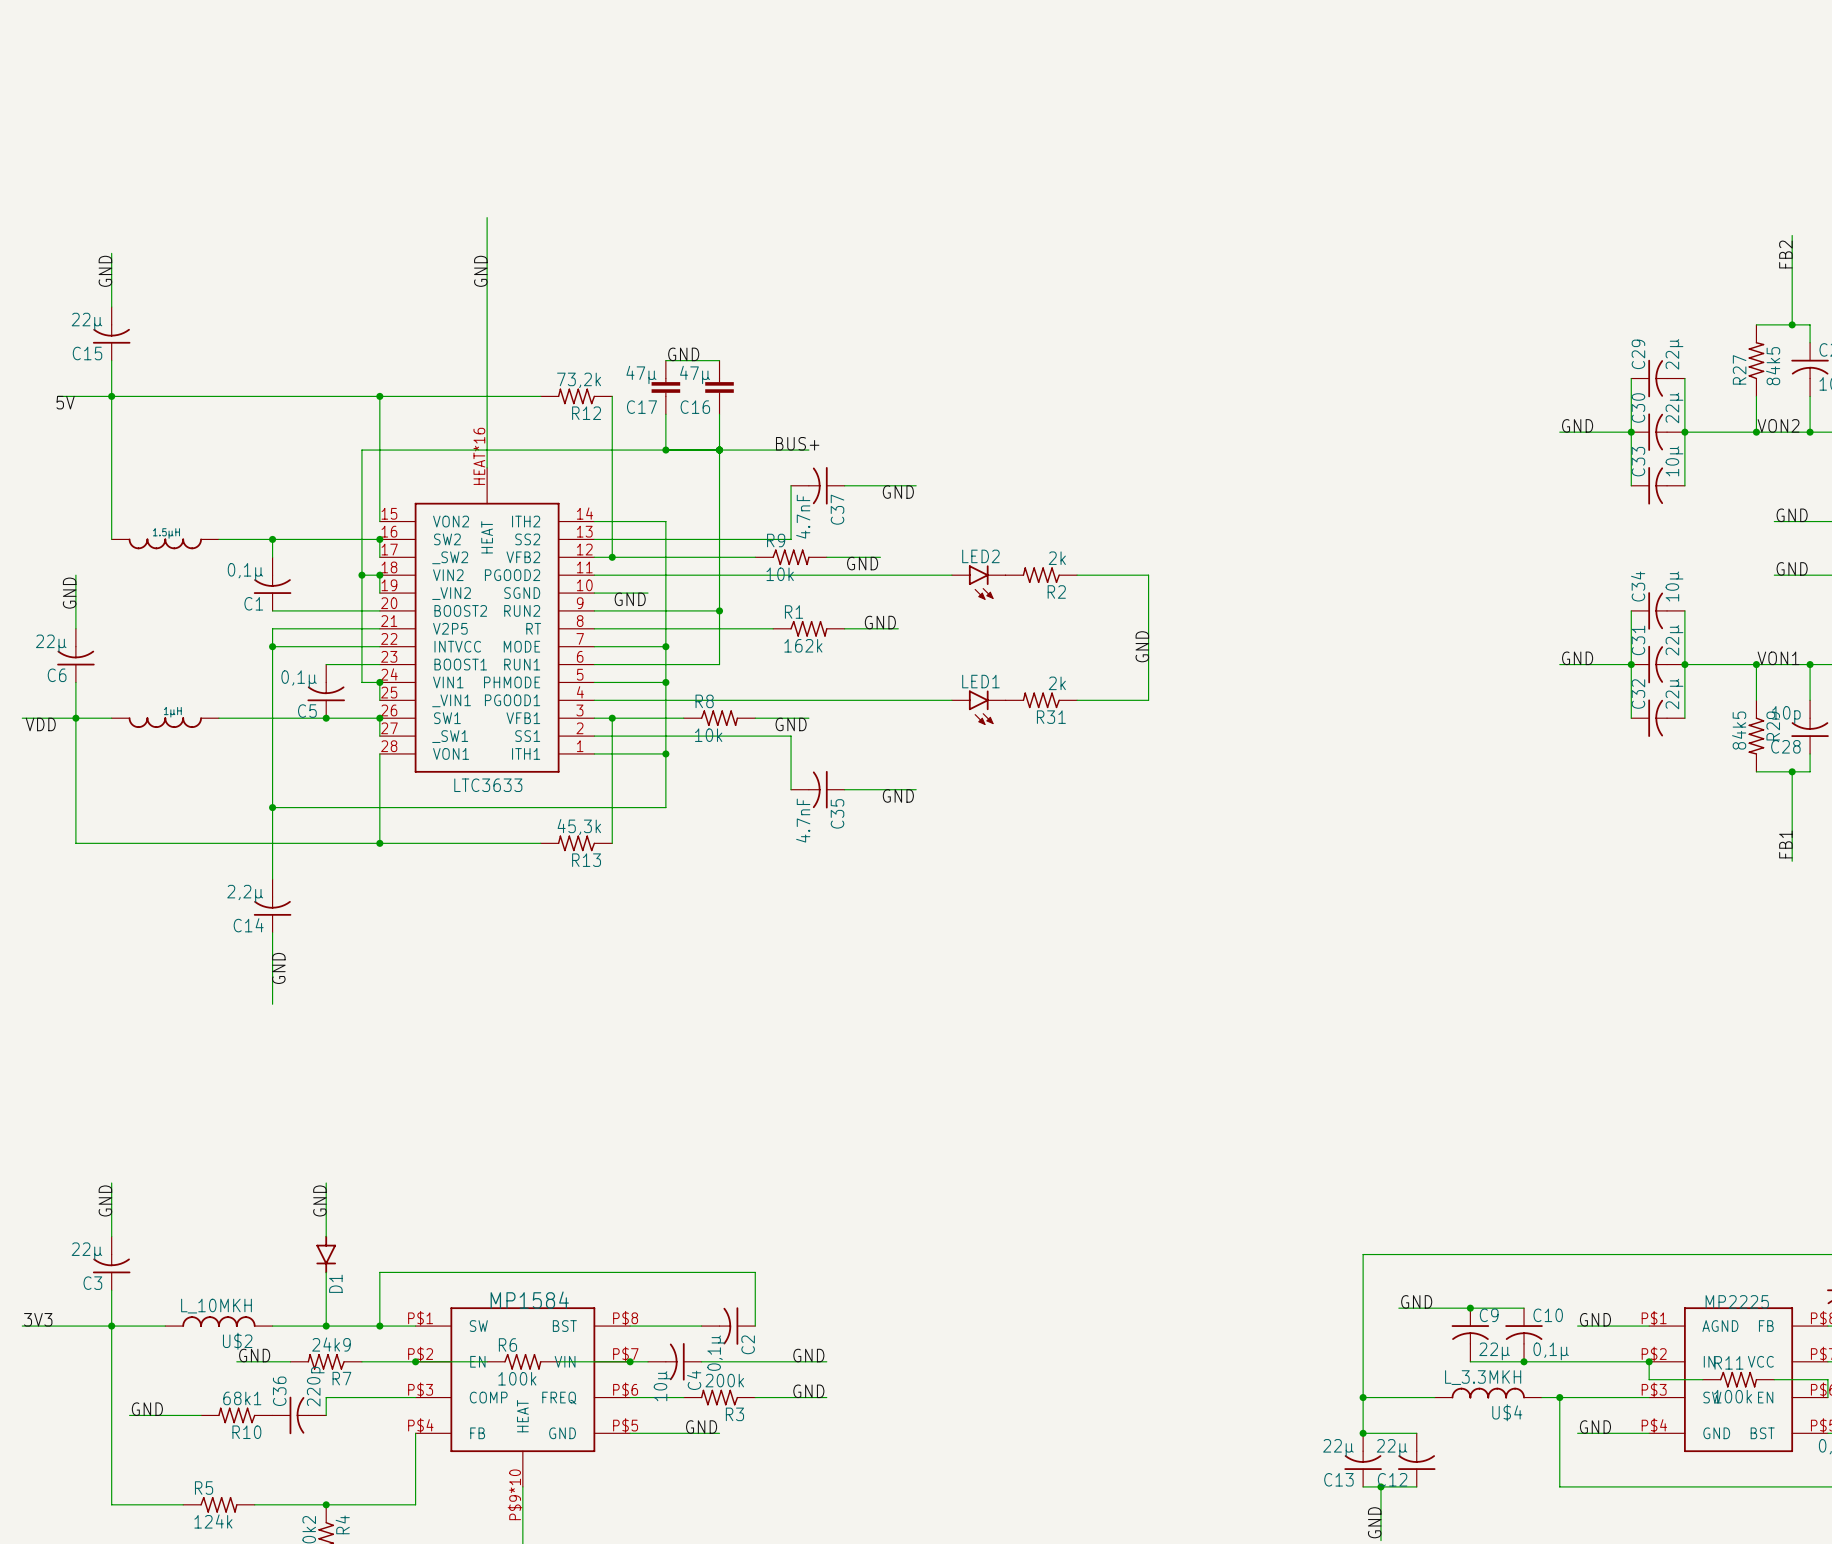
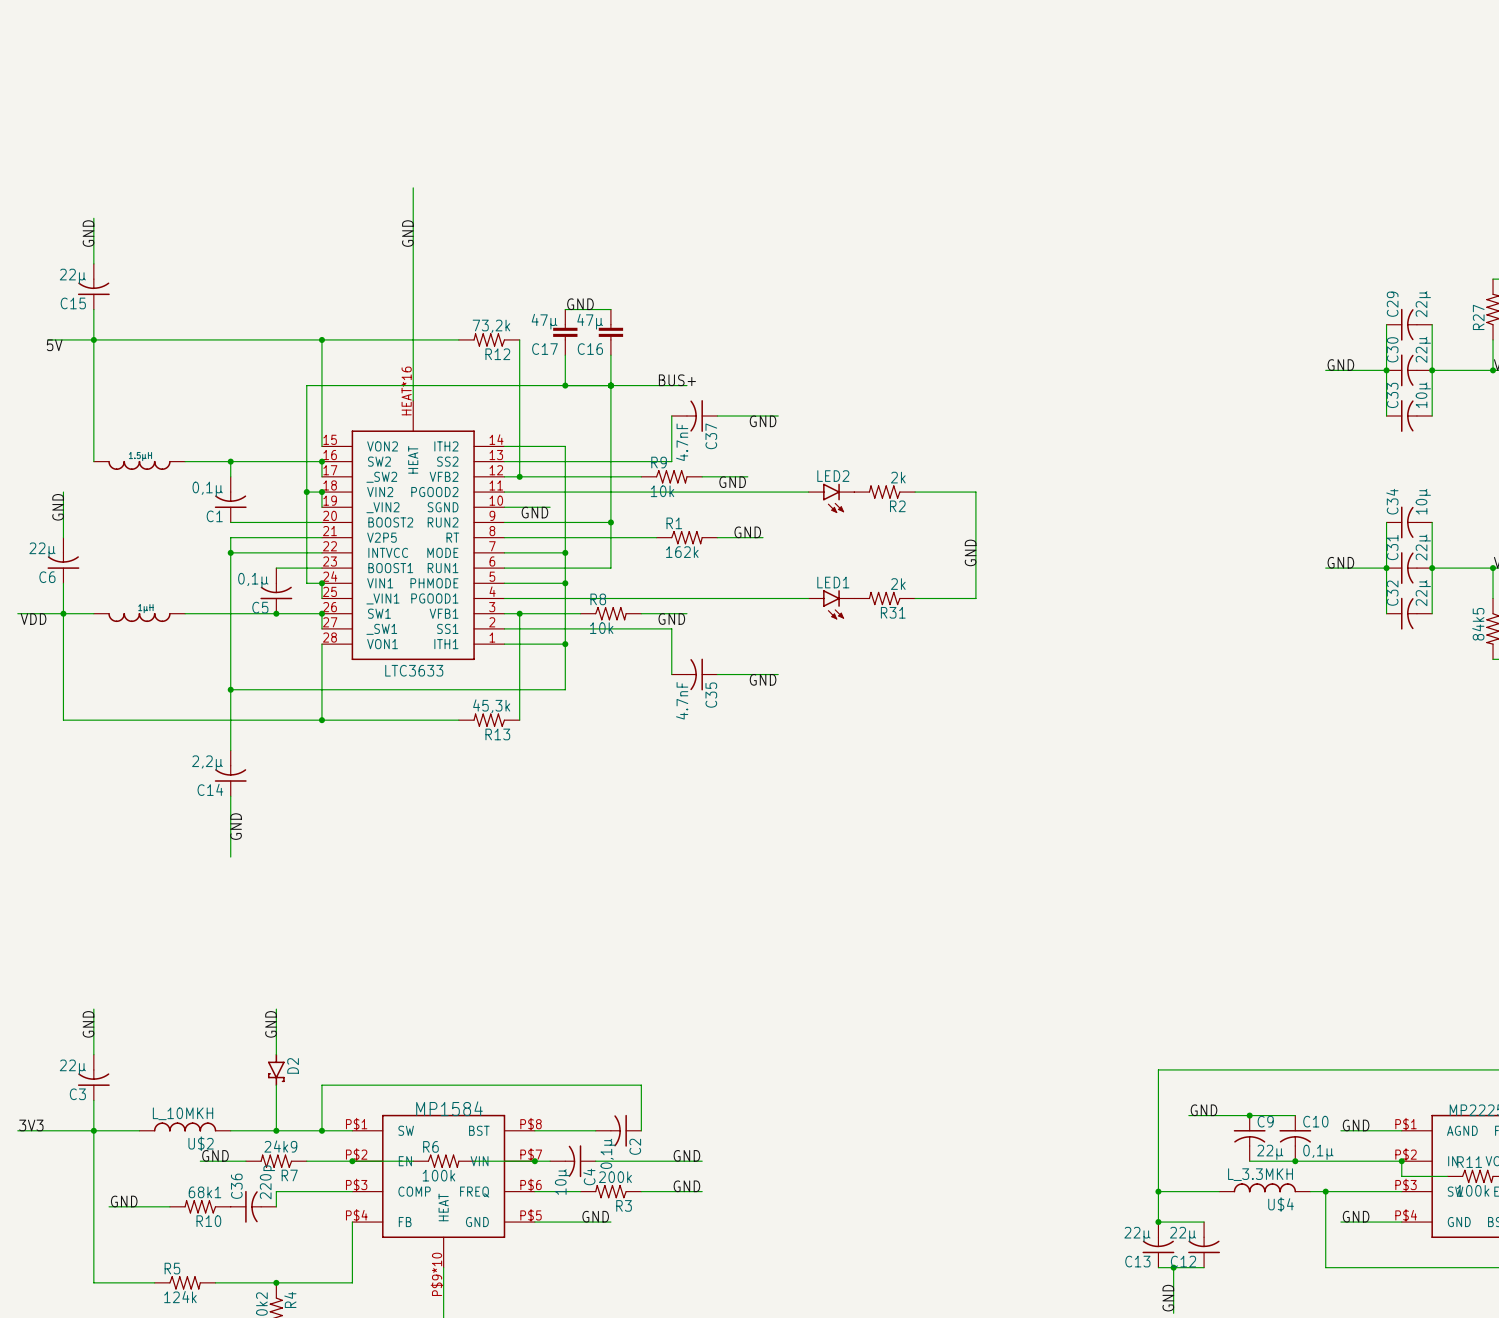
D1: (326, 1254) -> none
D2: none -> (276, 1069)

